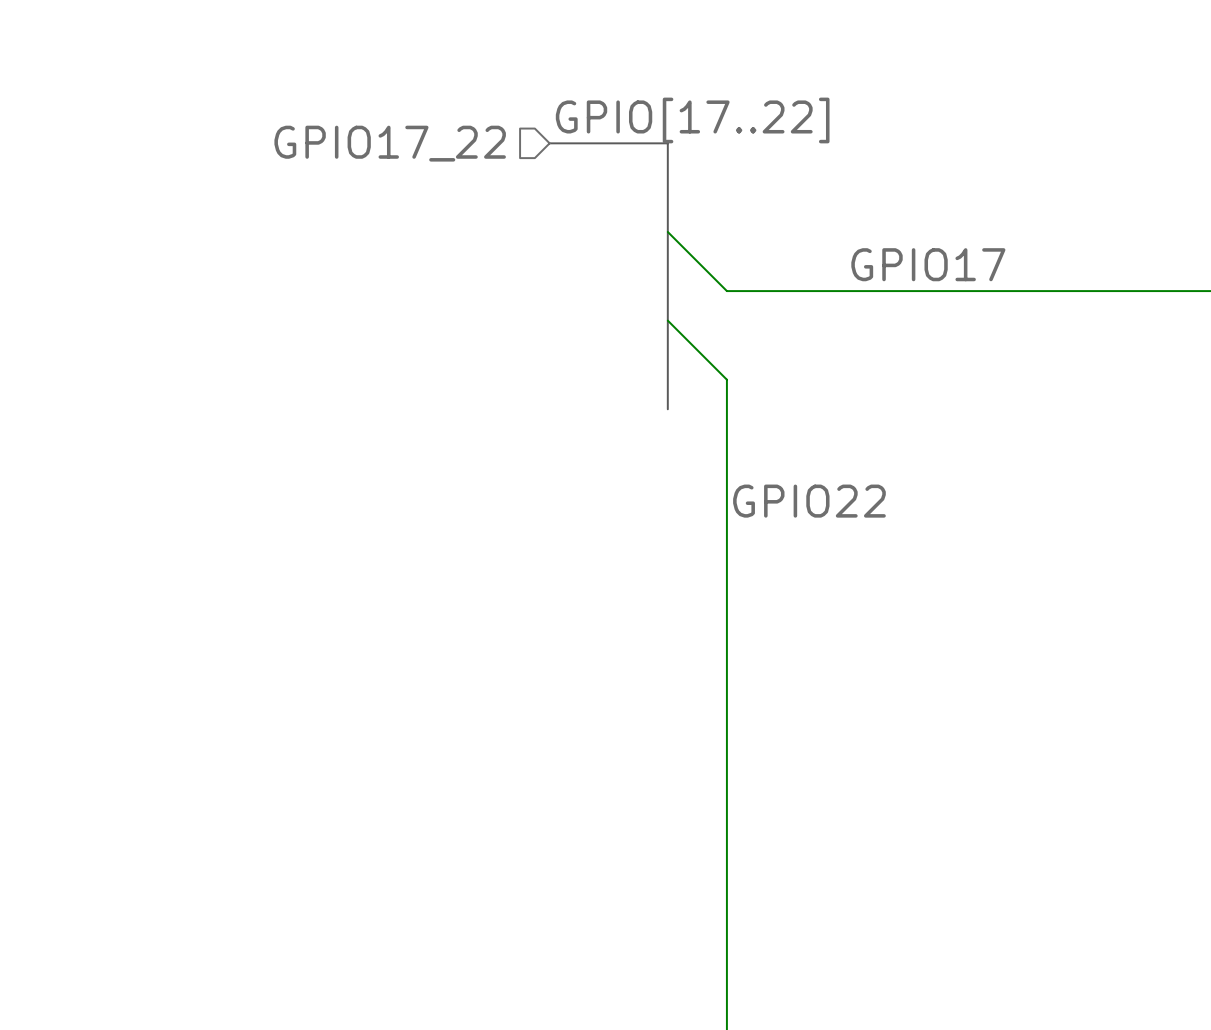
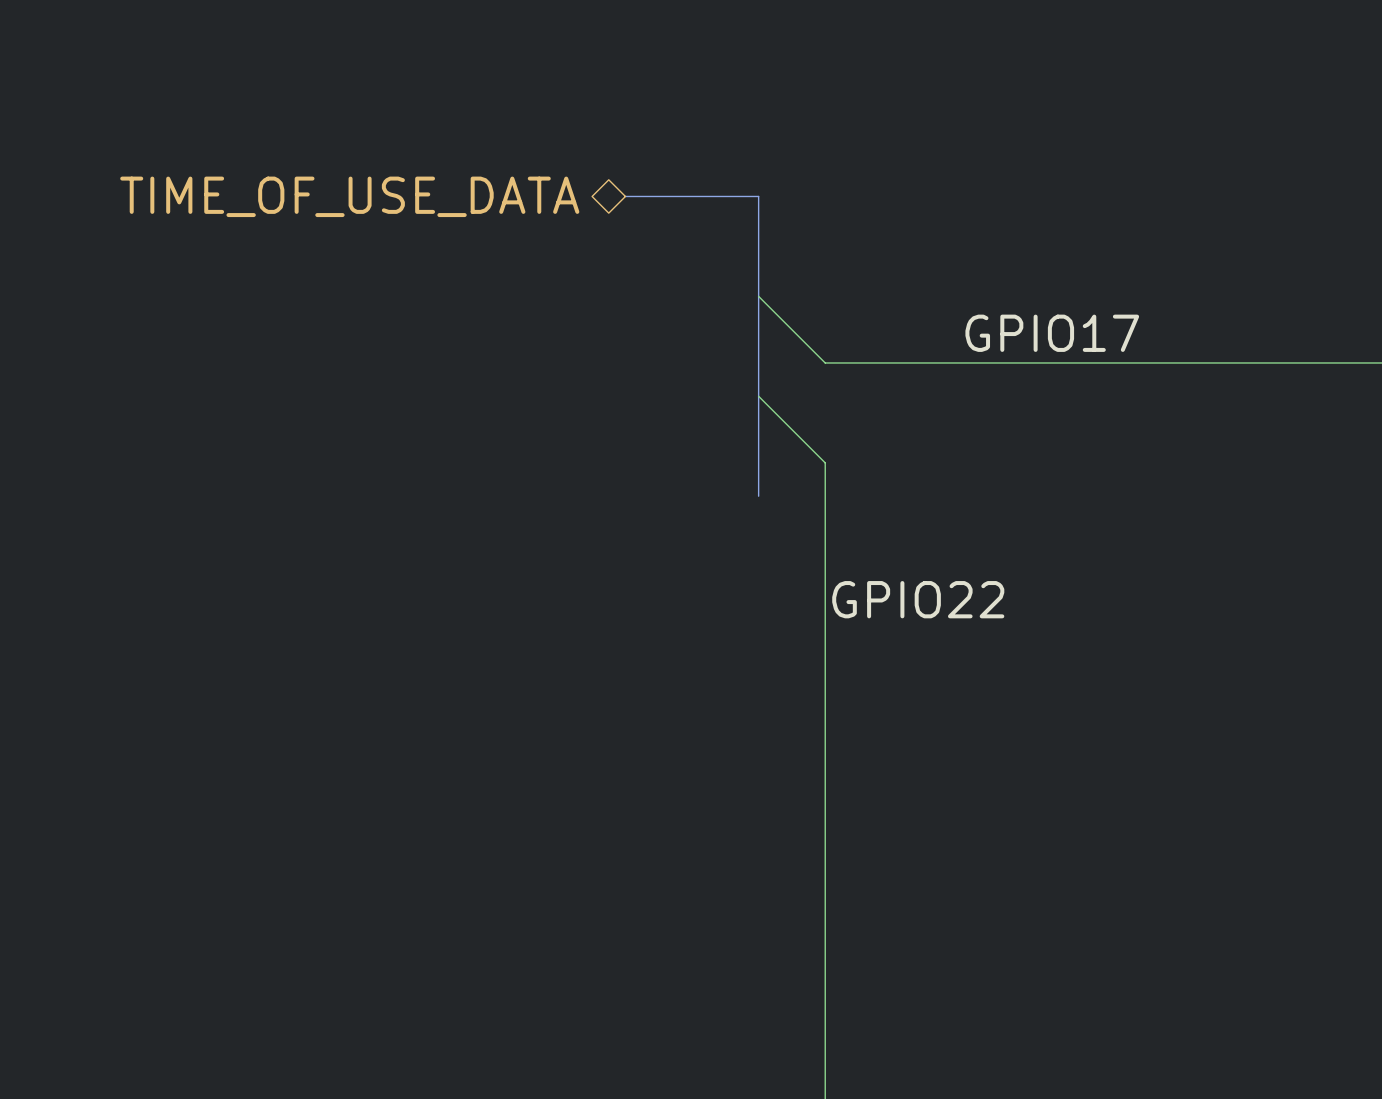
label: GPIO[17..22] (692, 120) -> none
hierarchical label shape: input (390, 143) -> bidirectional (349, 196)
hierarchical label: GPIO17_22 (390, 143) -> TIME_OF_USE_DATA (349, 196)

